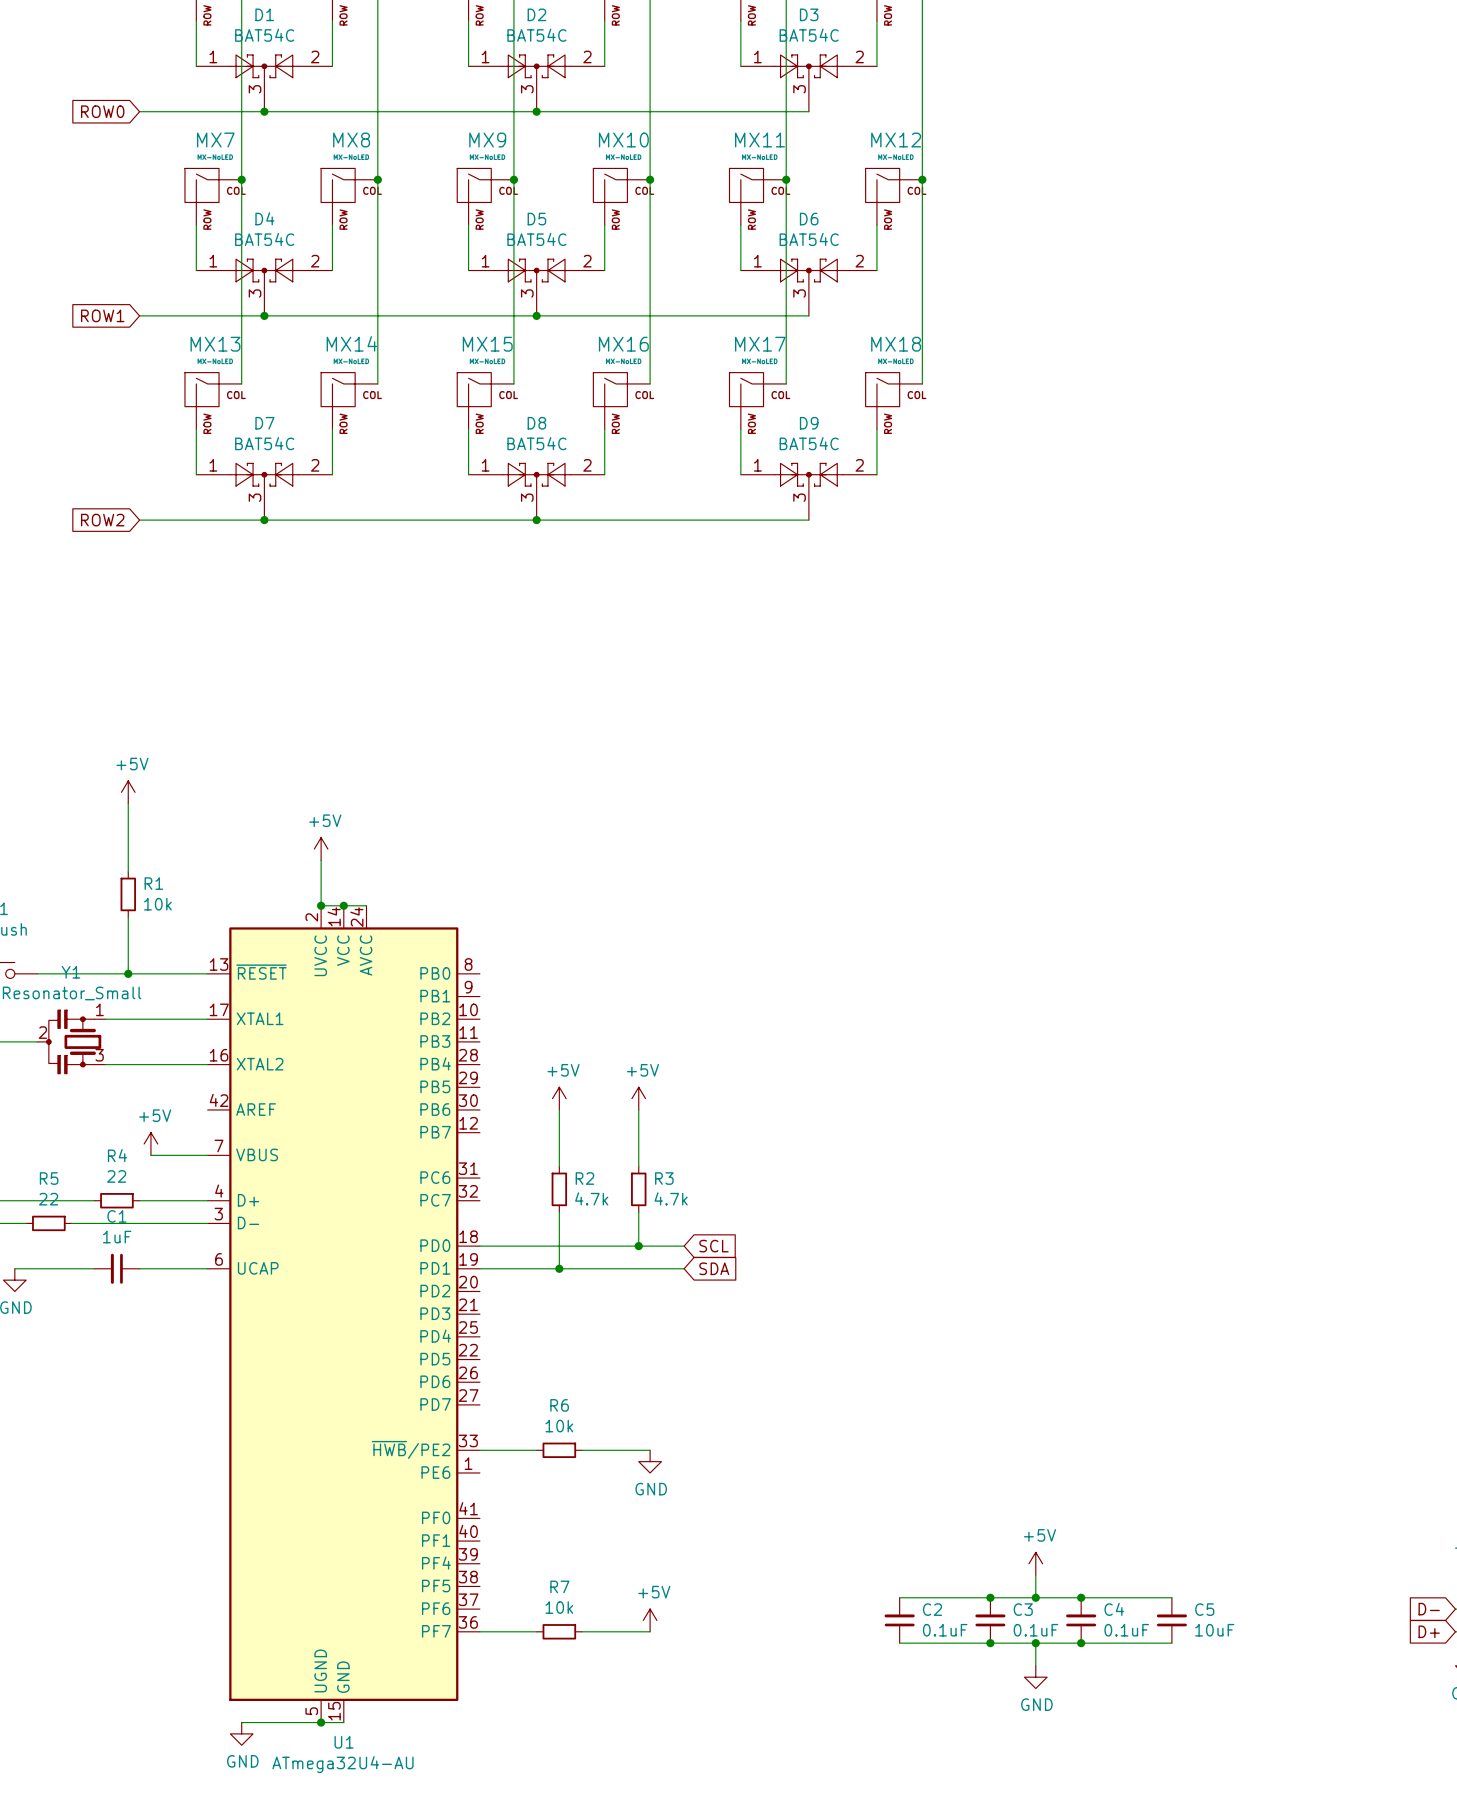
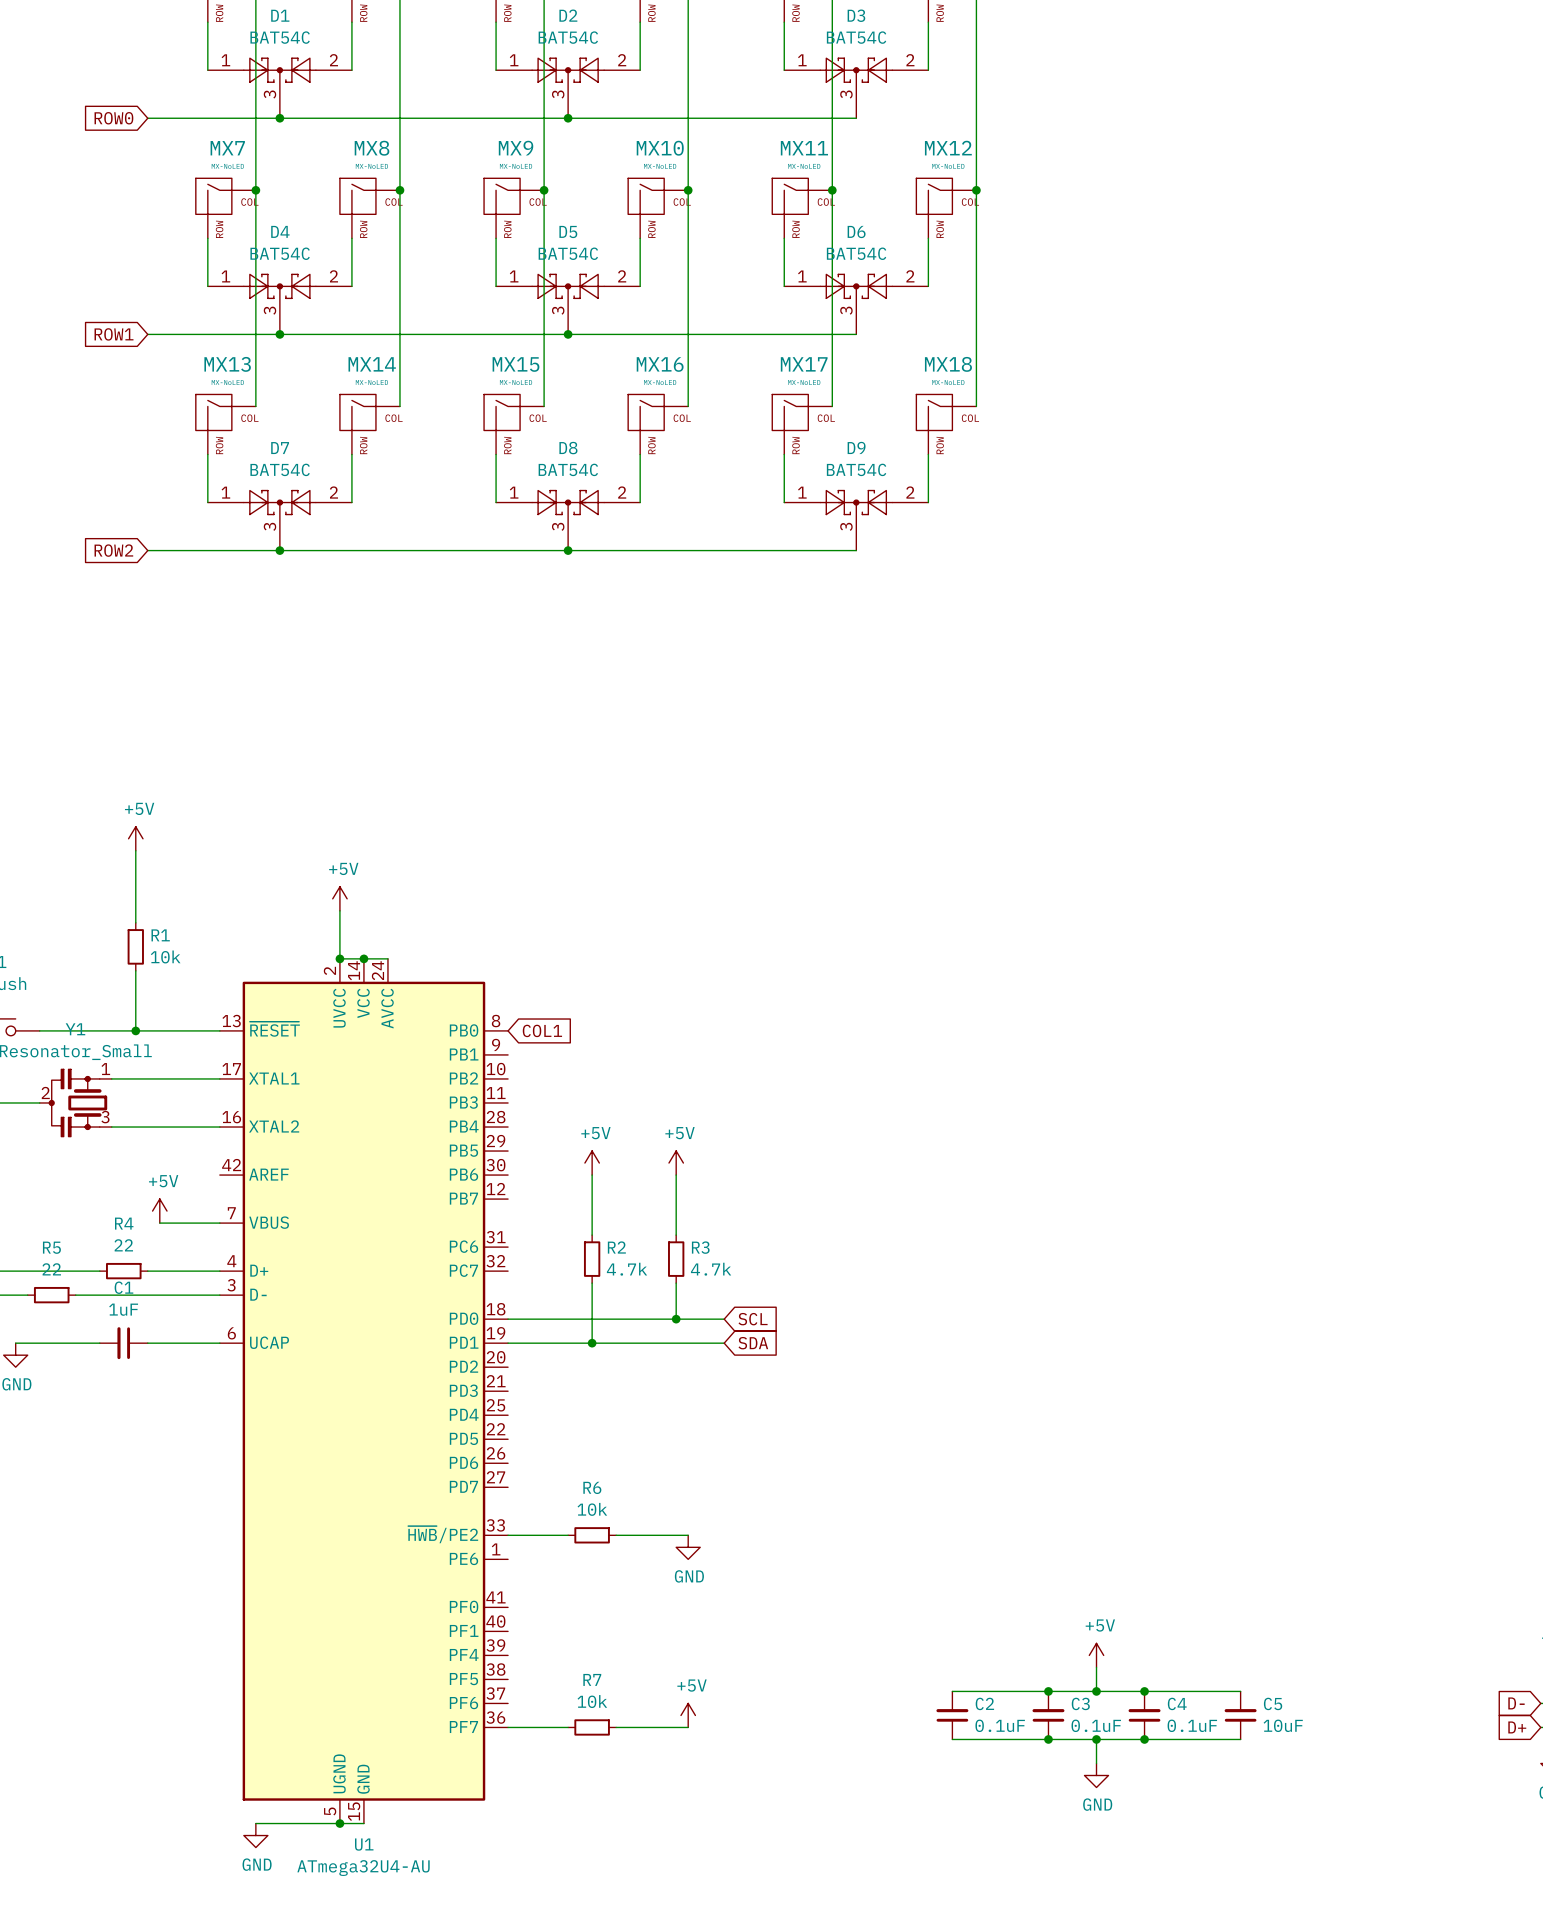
global label: none -> COL1 (542, 1030)

